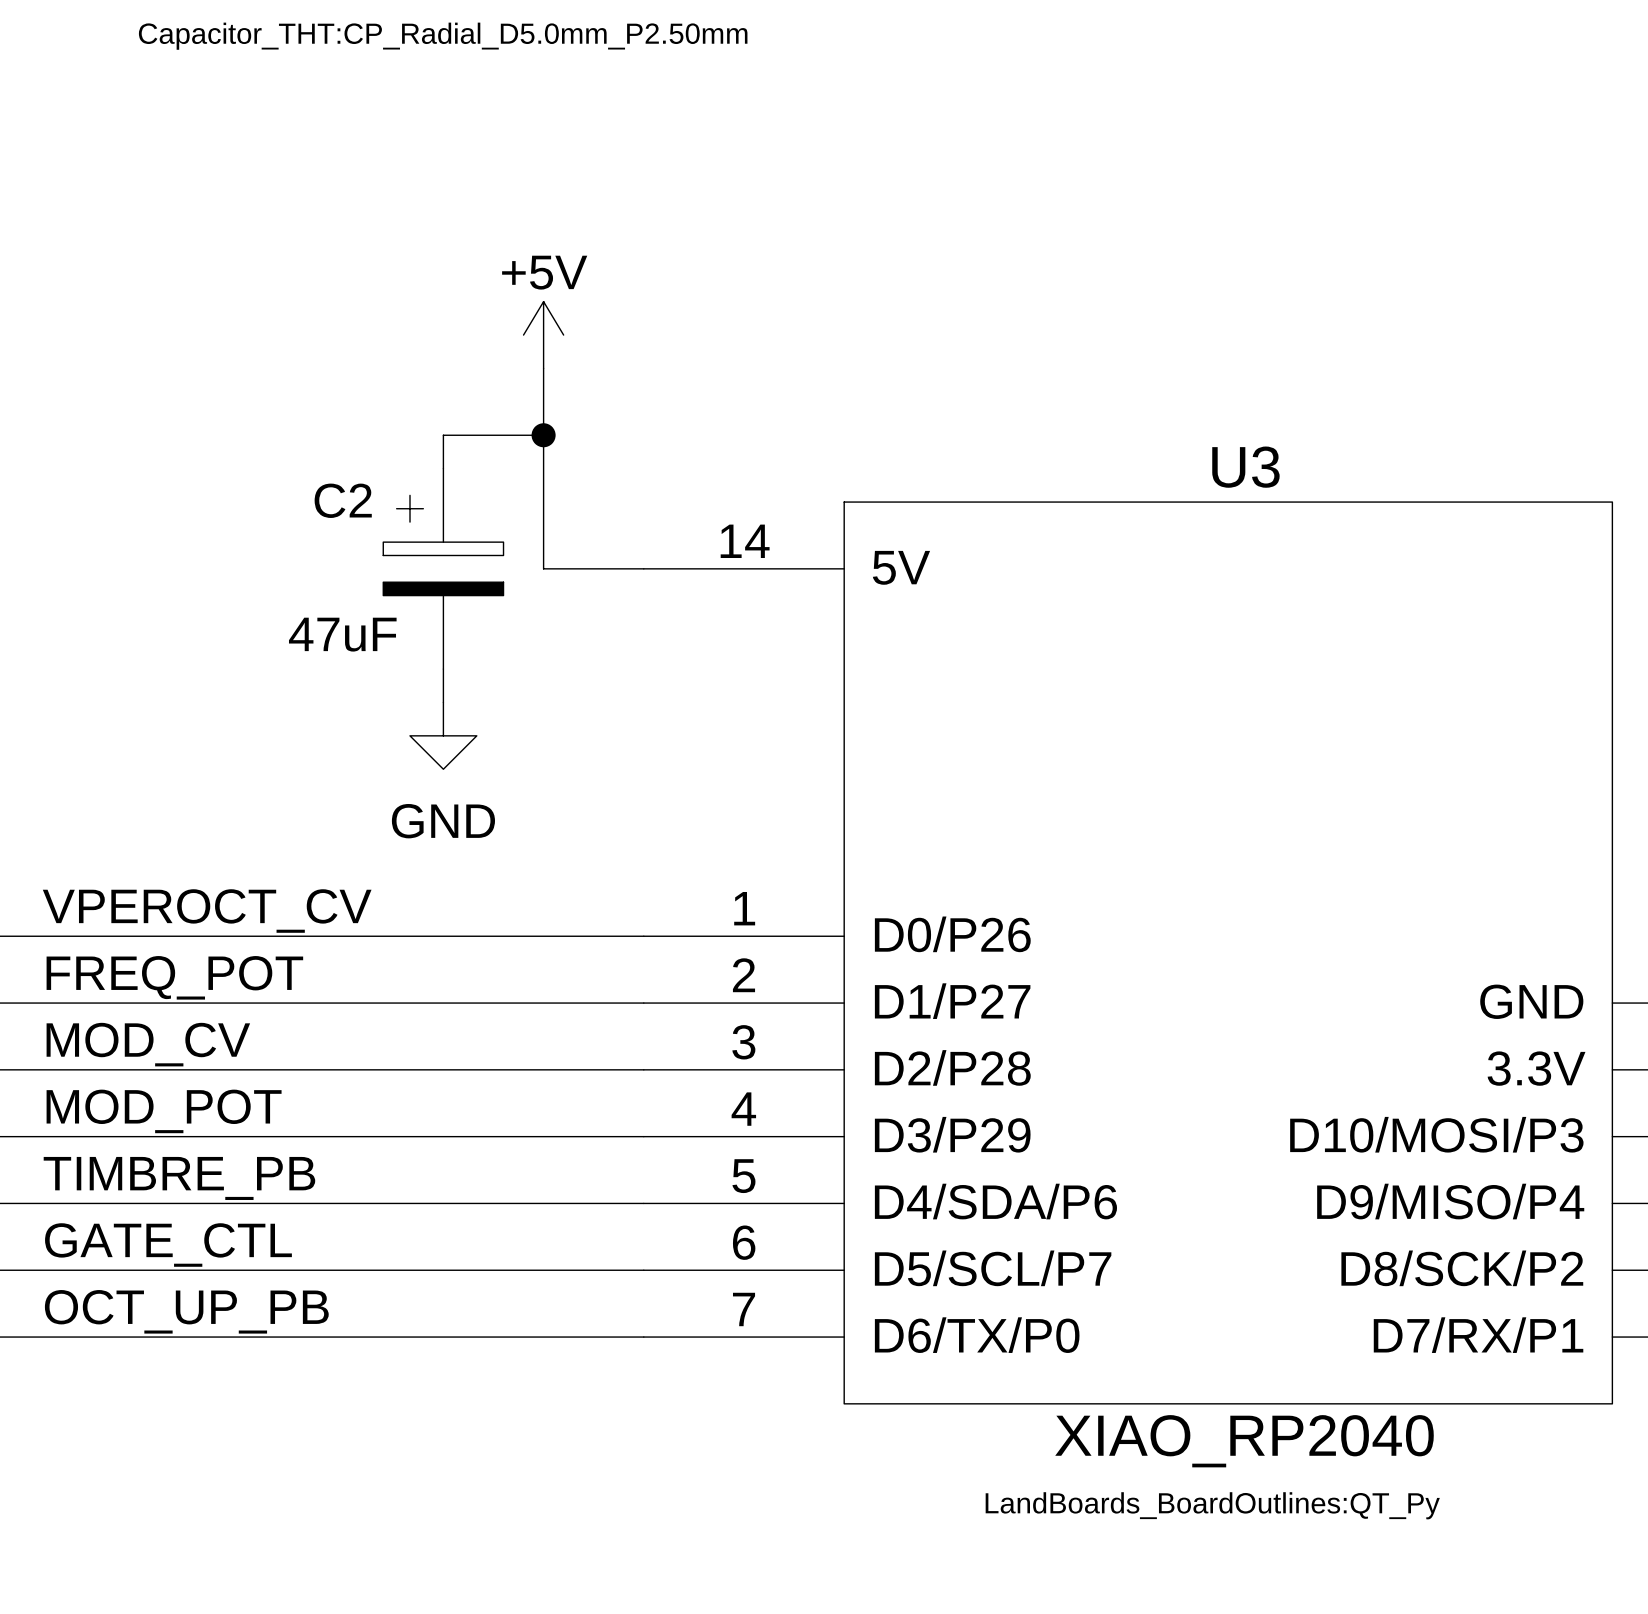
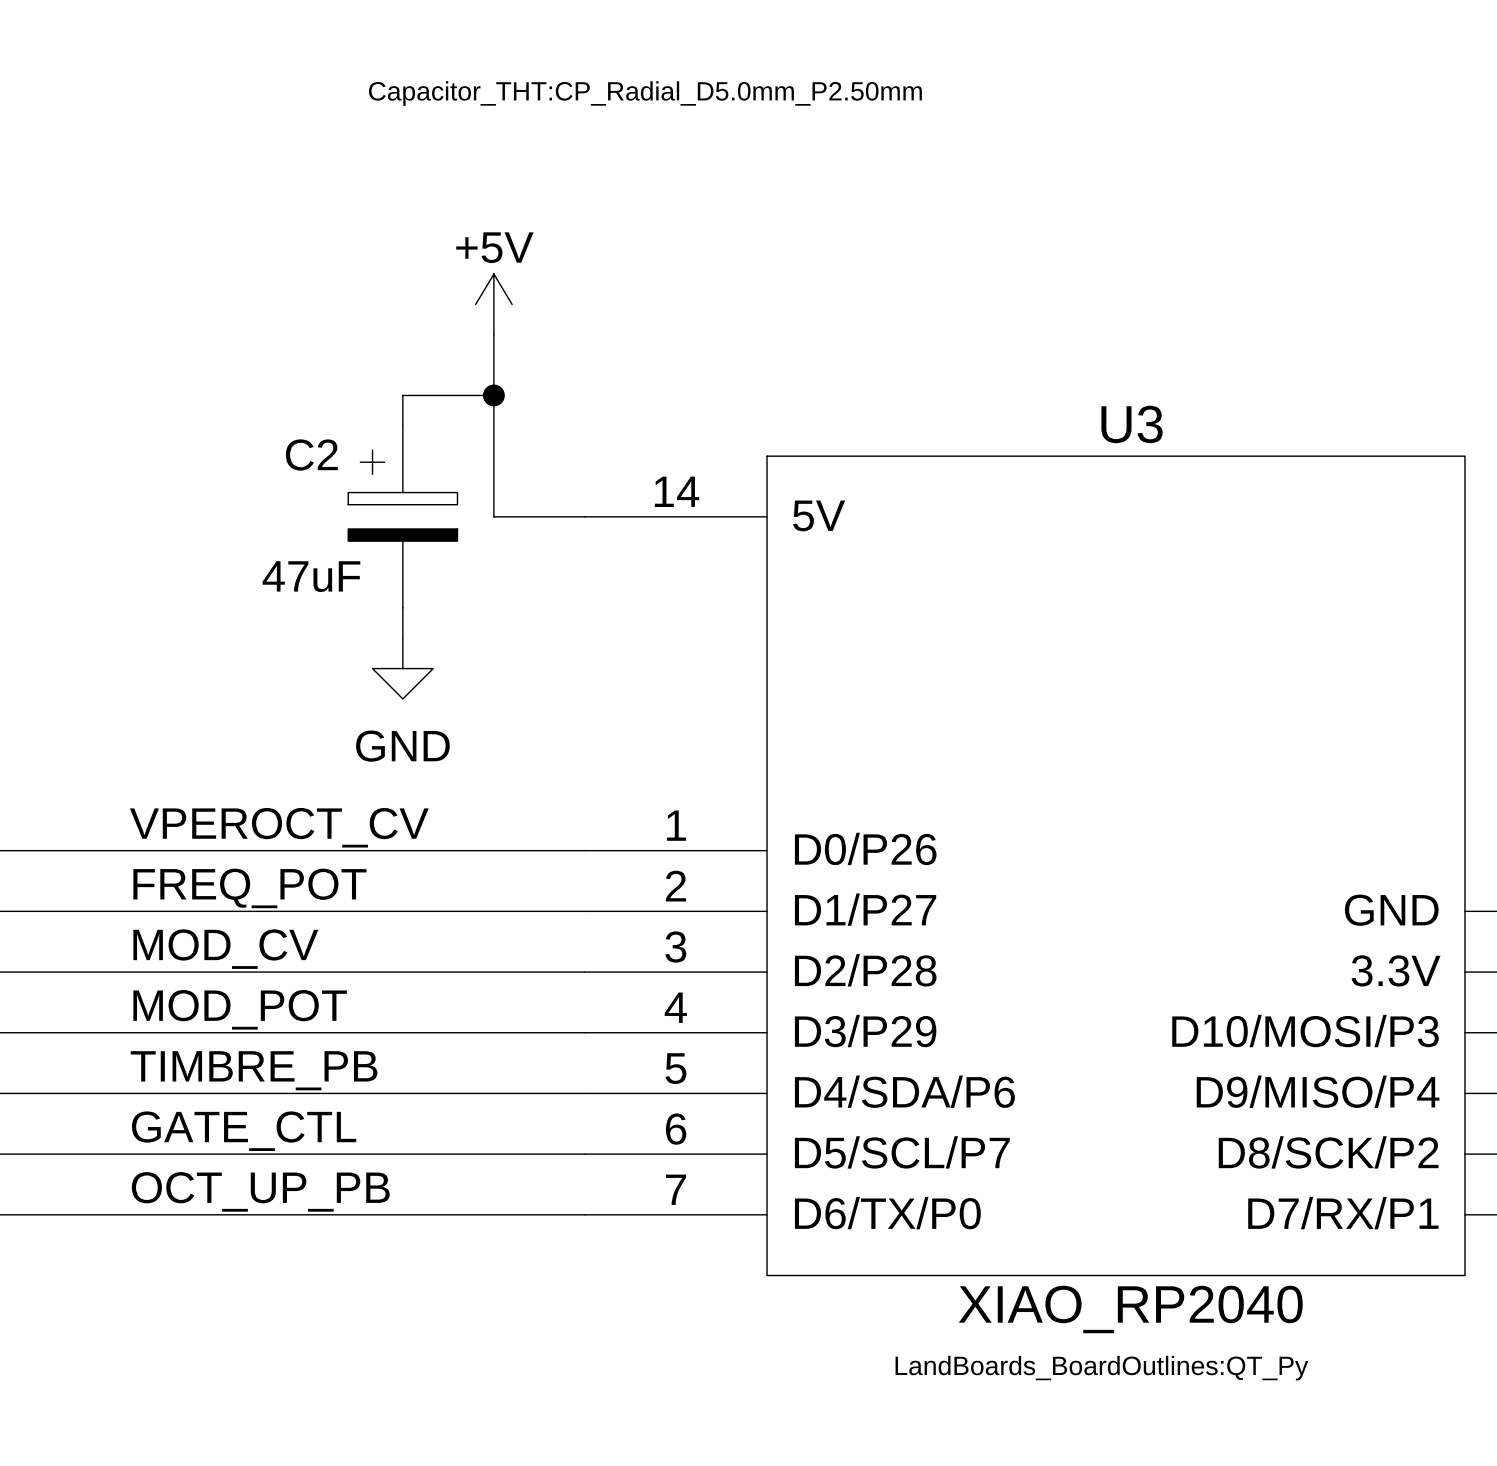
C2 text position: Capacitor_THT:CP_Radial_D5.0mm_P2.50mm (443, 36) -> Capacitor_THT:CP_Radial_D5.0mm_P2.50mm (645, 93)
label position: VPEROCT_CV (207, 911) -> VPEROCT_CV (279, 827)
label position: FREQ_POT (174, 977) -> FREQ_POT (249, 888)
label position: MOD_CV (148, 1044) -> MOD_CV (225, 949)
label position: MOD_POT (164, 1111) -> MOD_POT (240, 1009)
label position: TIMBRE_PB (179, 1178) -> TIMBRE_PB (254, 1070)
label position: GATE_CTL (168, 1245) -> GATE_CTL (244, 1131)
label position: OCT_UP_PB (186, 1311) -> OCT_UP_PB (260, 1191)

